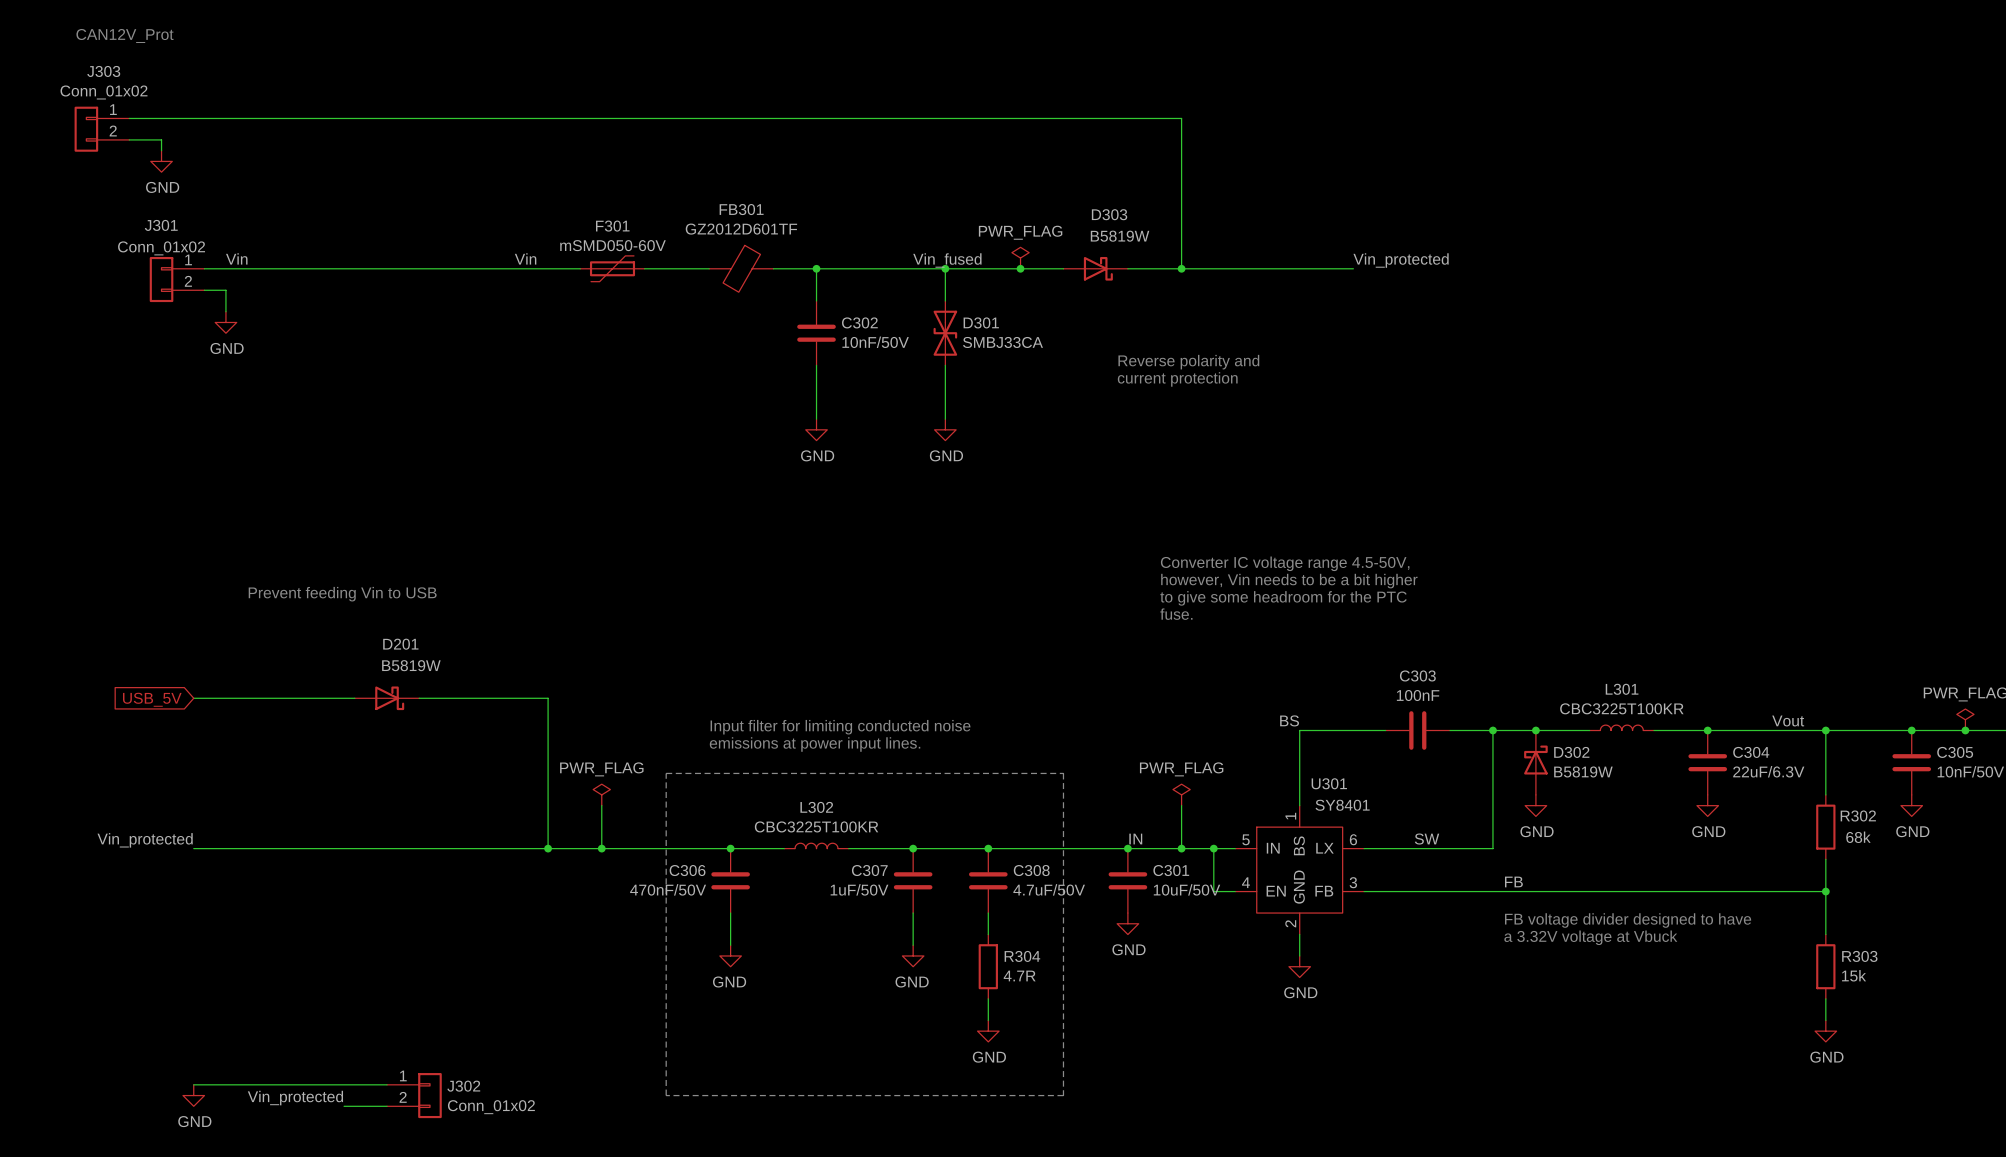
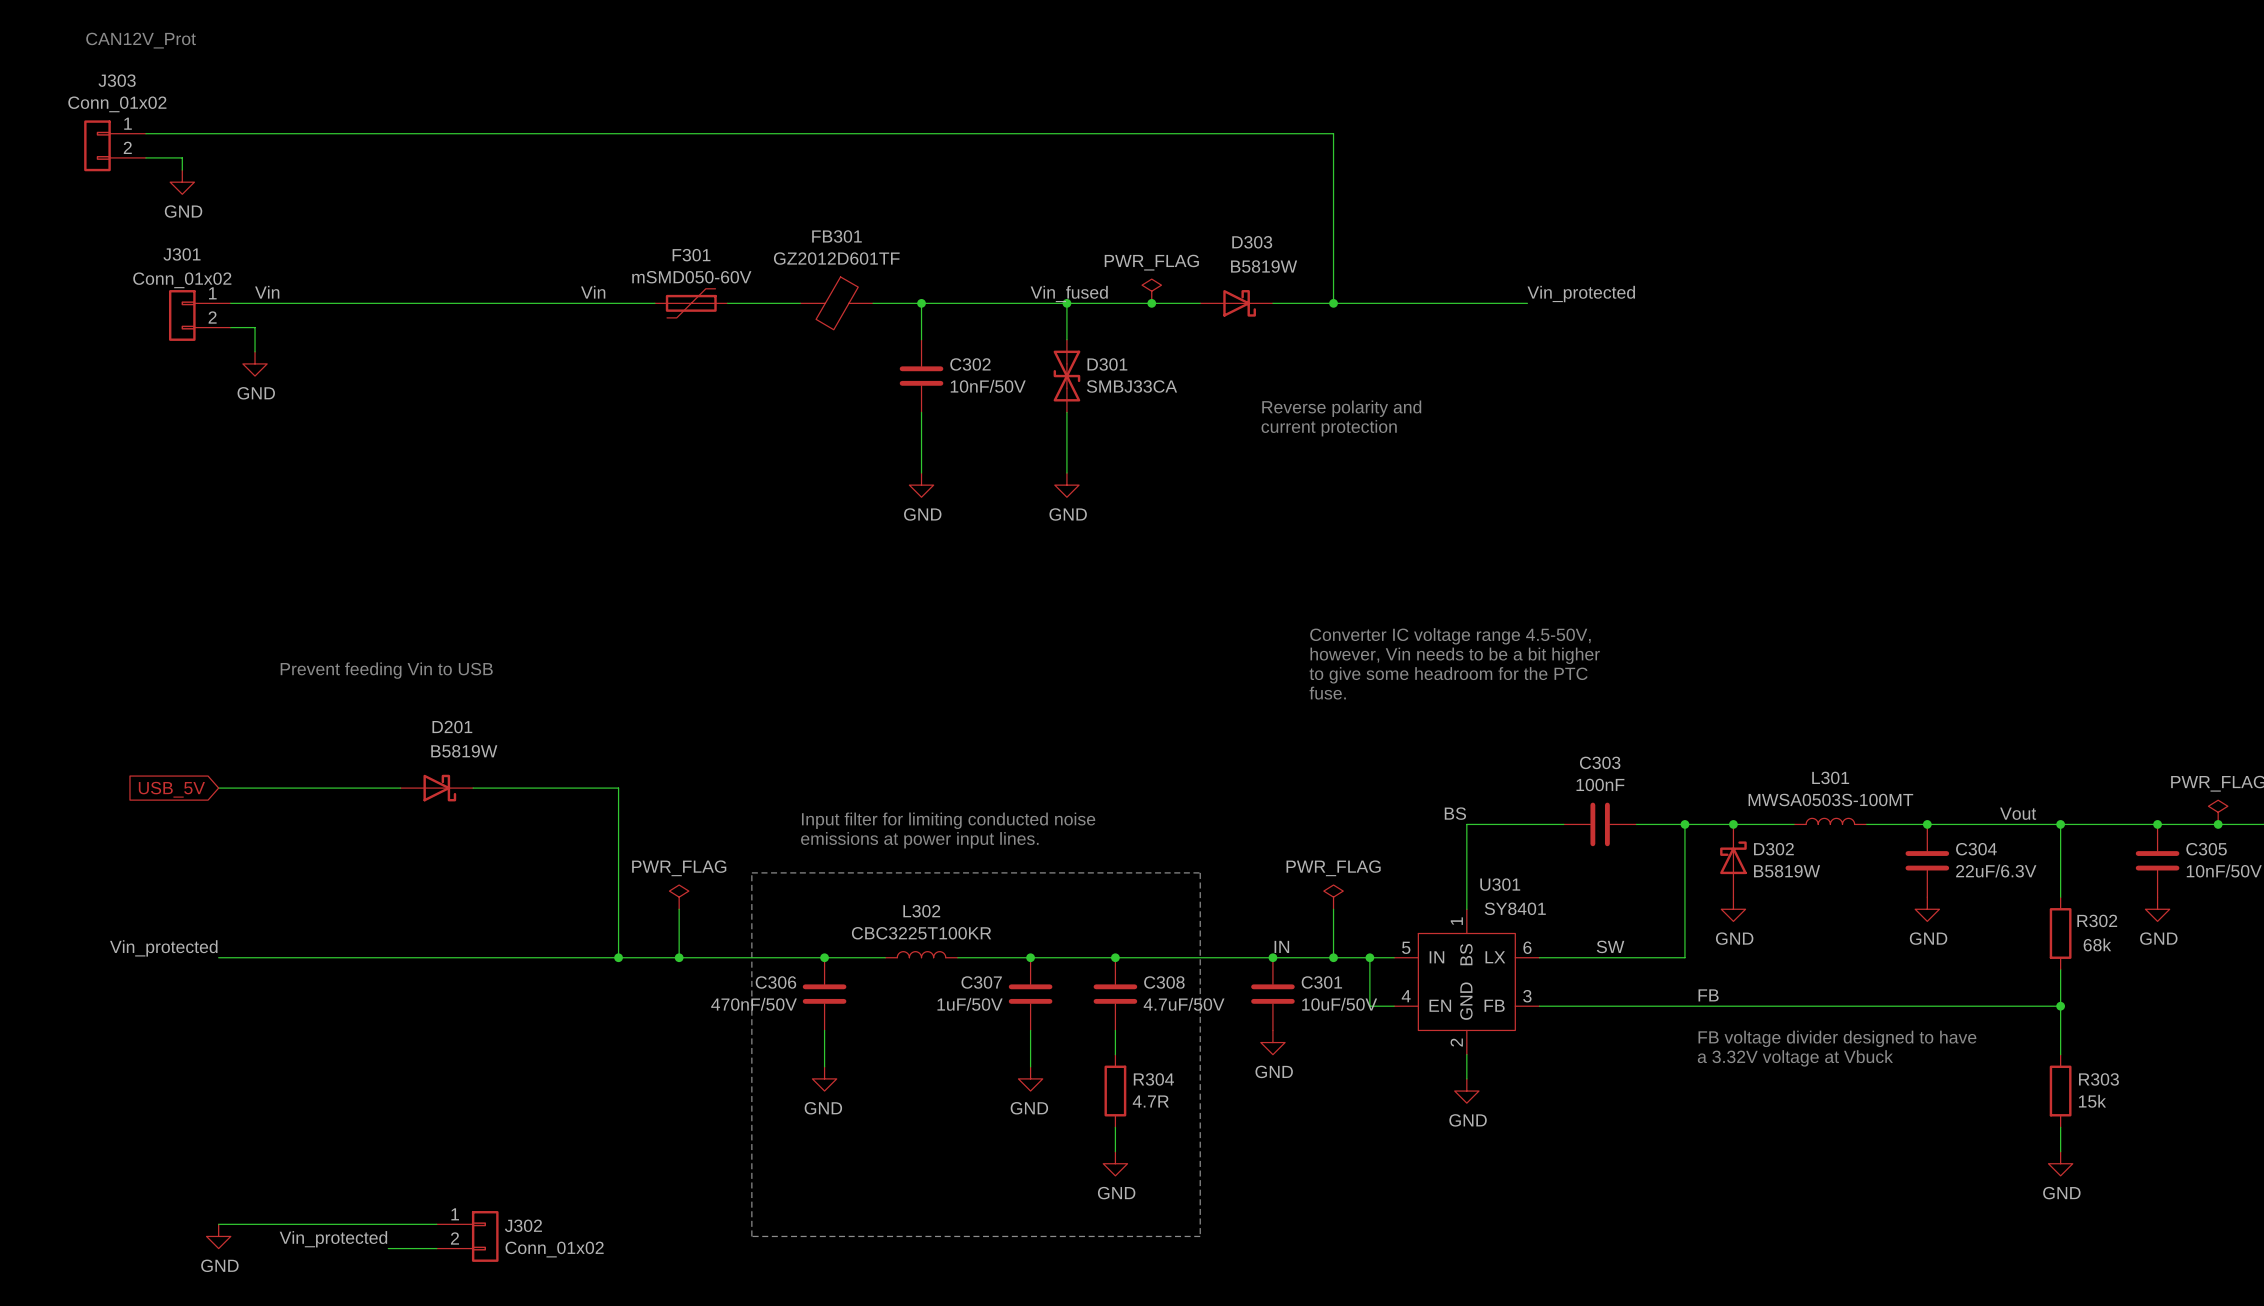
L301 value: CBC3225T100KR (1621, 708) -> MWSA0503S-100MT (1830, 799)

